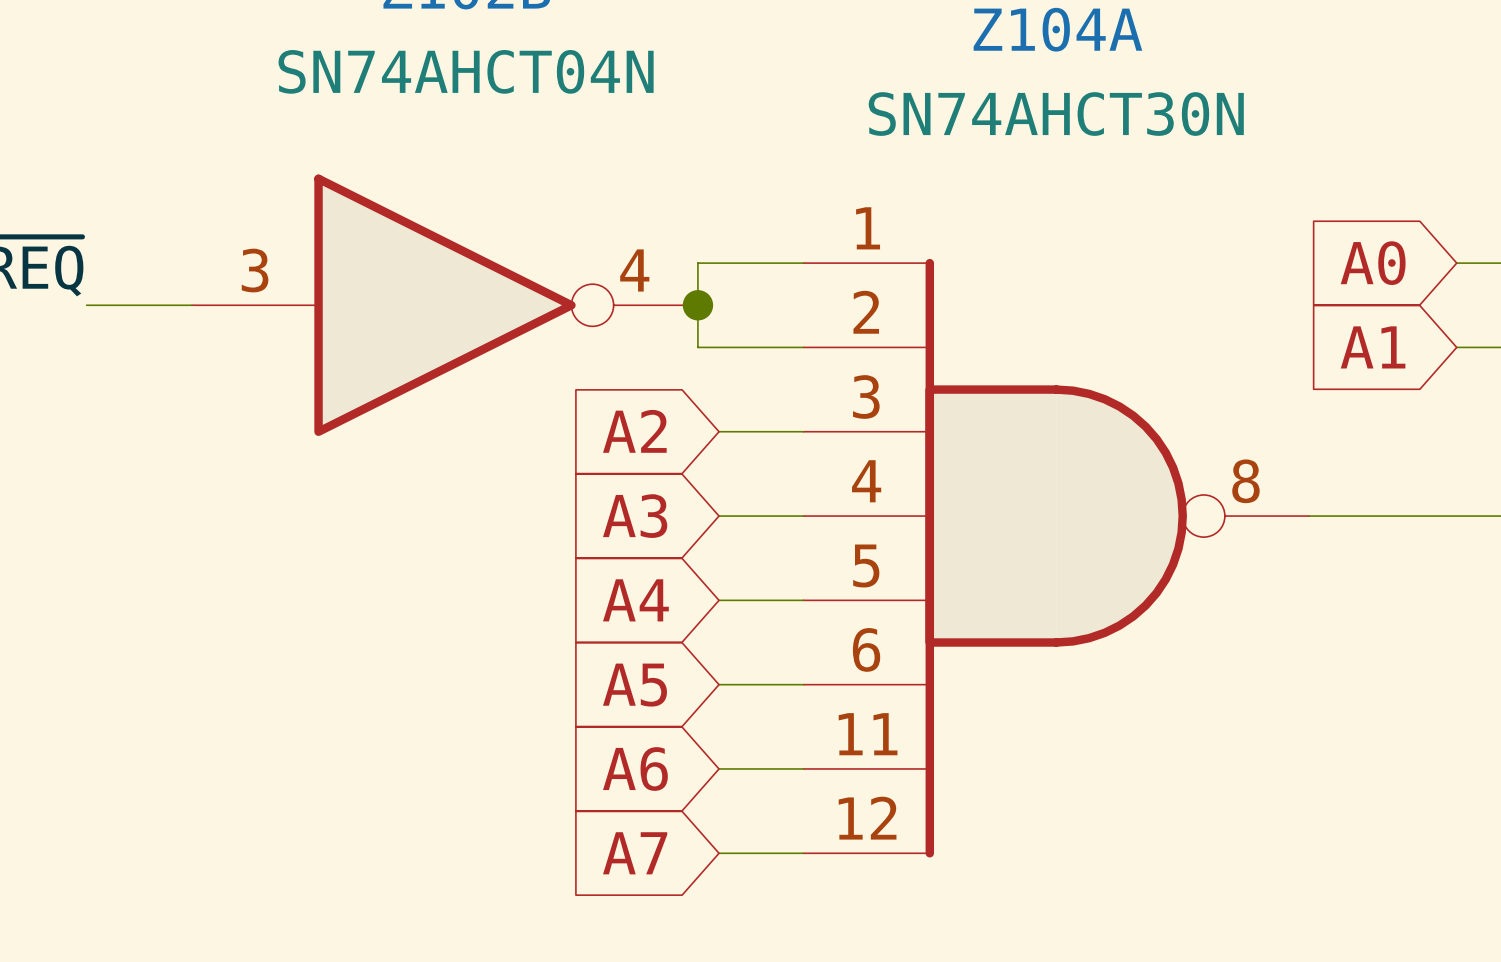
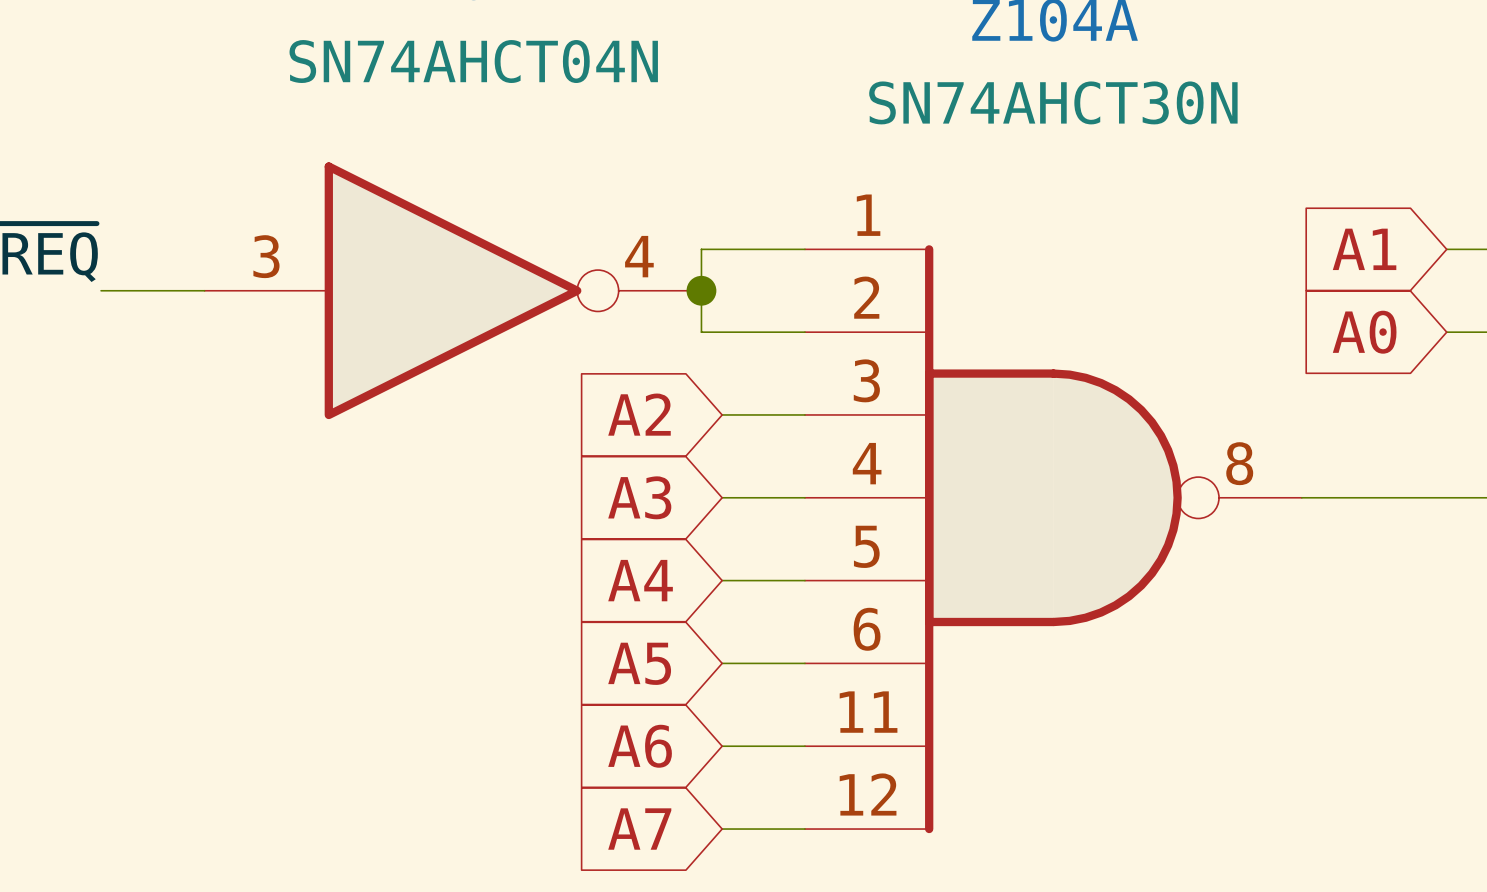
global label: A0 (1373, 263) -> A1 (1364, 249)
global label: A1 (1373, 347) -> A0 (1364, 332)

